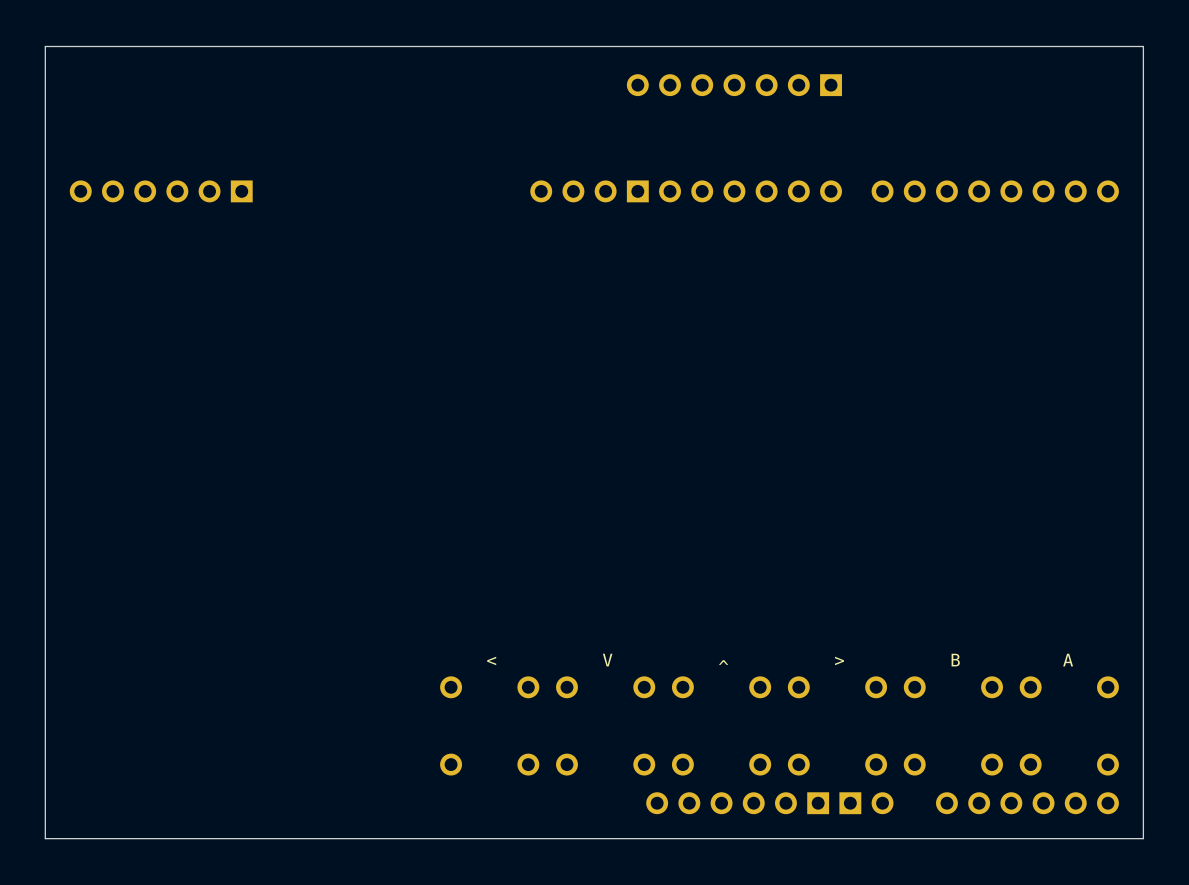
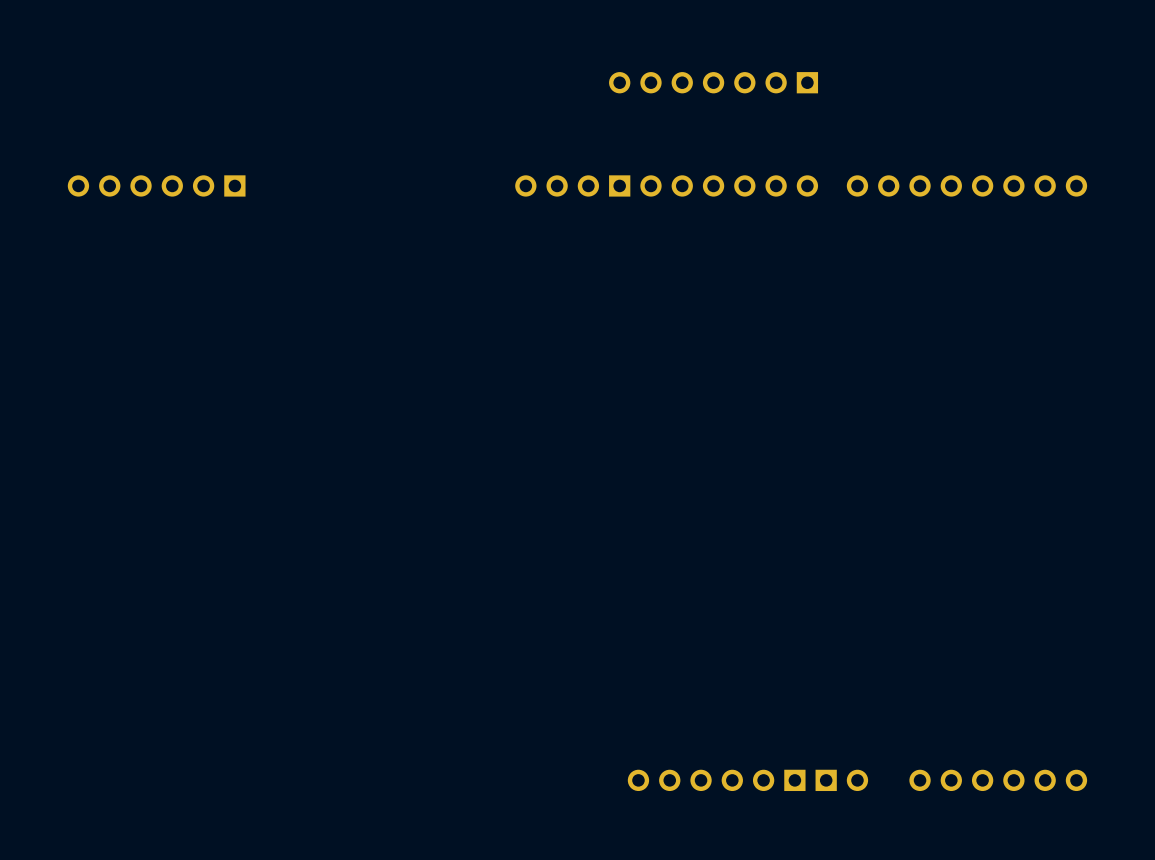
board edge: (45, 46) (1143, 46) (1143, 838) (45, 838) (45, 46) -> none
text: < (491, 660) -> none
text: V (607, 660) -> none
text: > (839, 660) -> none
text: B (955, 660) -> none
text: A (1068, 660) -> none
text: ^ (723, 662) -> none
part: (451, 687) -> none
part: (528, 687) -> none
part: (566, 687) -> none
part: (644, 687) -> none
part: (682, 687) -> none
part: (760, 687) -> none
part: (798, 687) -> none
part: (876, 687) -> none
part: (914, 687) -> none
part: (992, 687) -> none
part: (1030, 687) -> none
part: (1107, 687) -> none
part: (451, 764) -> none
part: (528, 764) -> none
part: (566, 764) -> none
part: (644, 764) -> none
part: (682, 764) -> none
part: (760, 764) -> none
part: (798, 764) -> none
part: (876, 764) -> none
part: (914, 764) -> none
part: (992, 764) -> none
part: (1030, 764) -> none
part: (1107, 764) -> none

